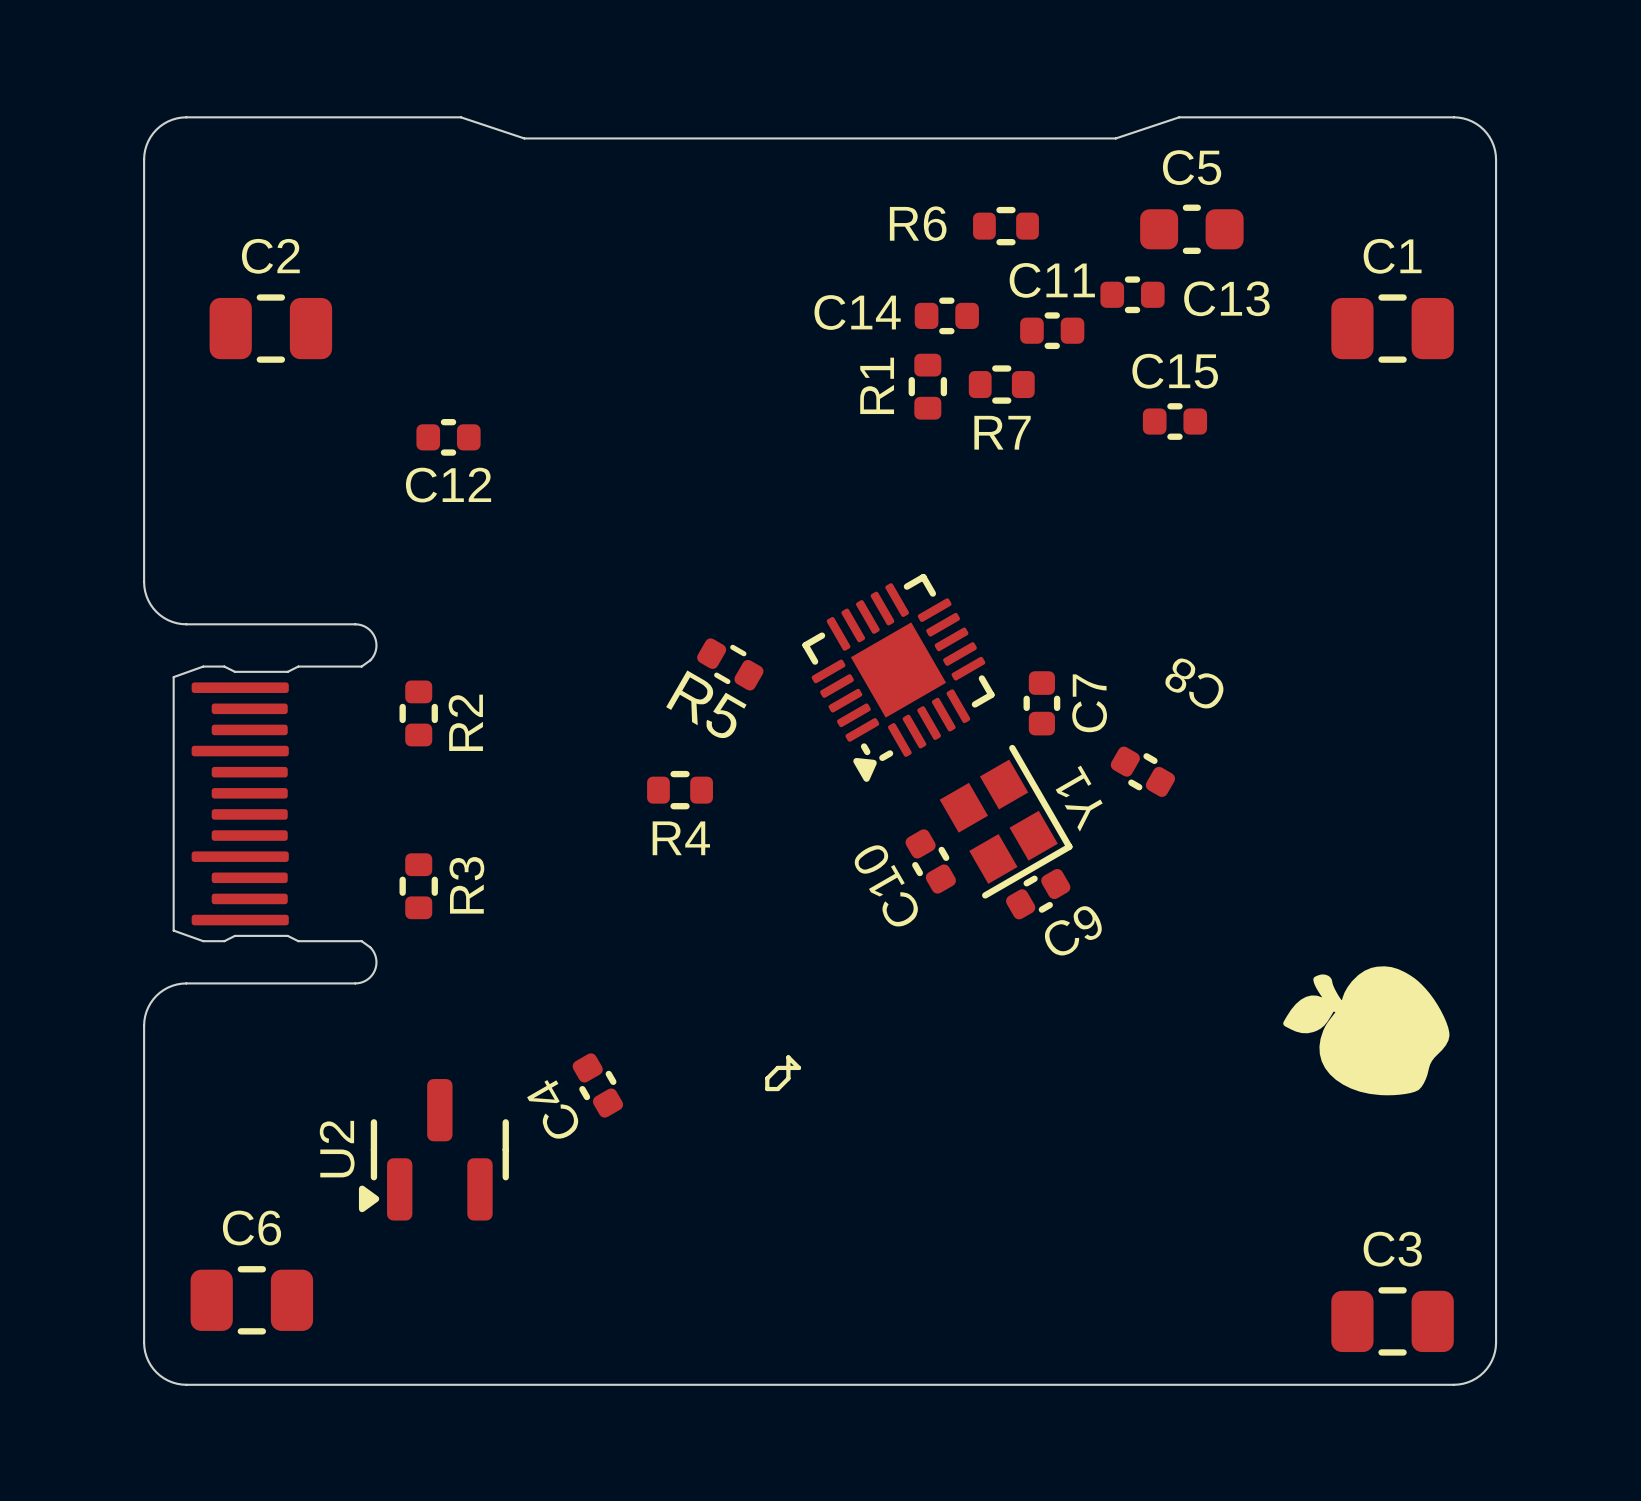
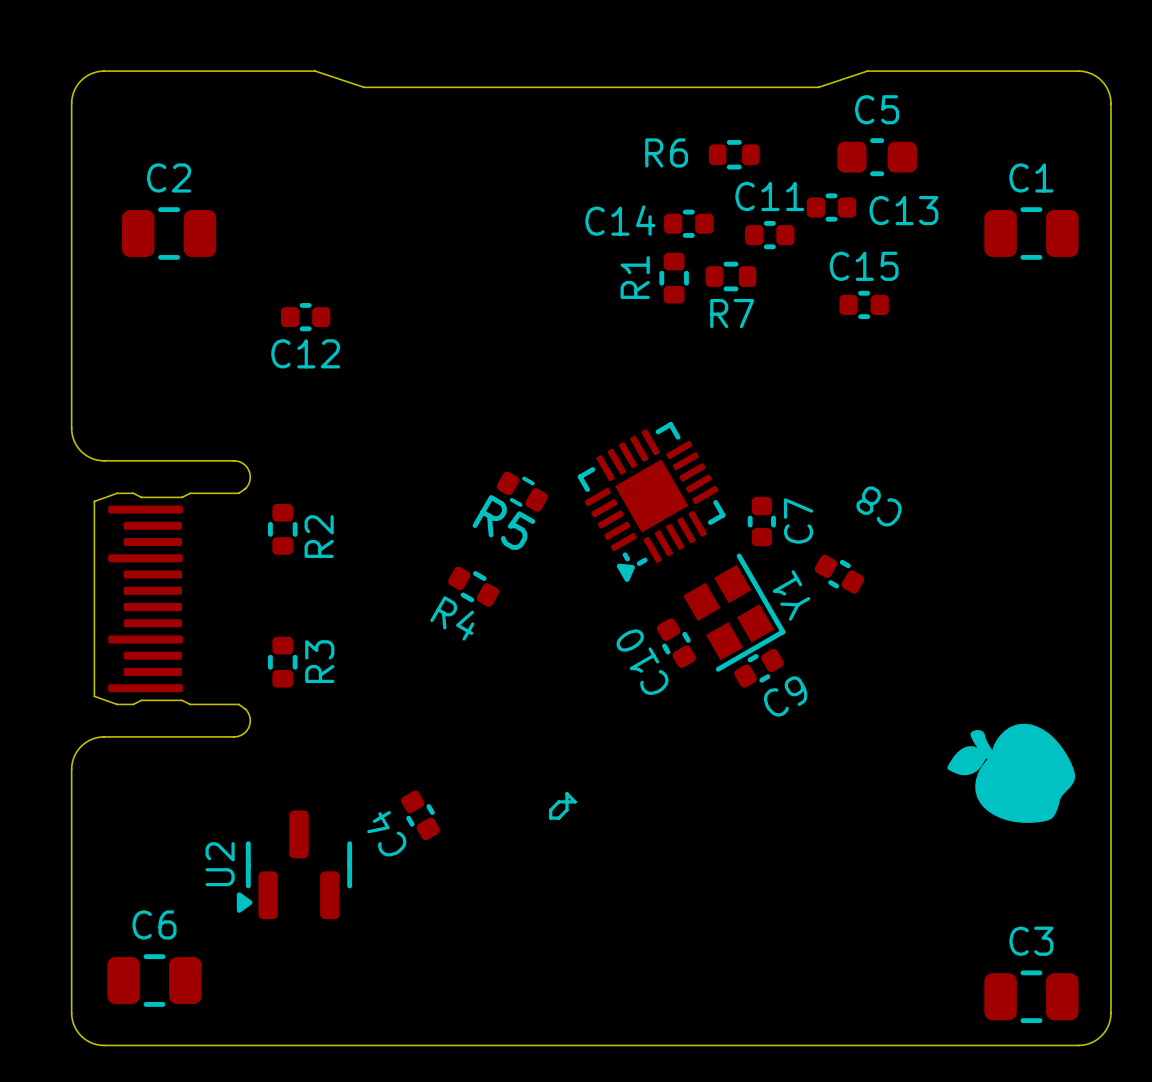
R4 rotation: 0° (680, 790) -> 30° clockwise (473, 586)

